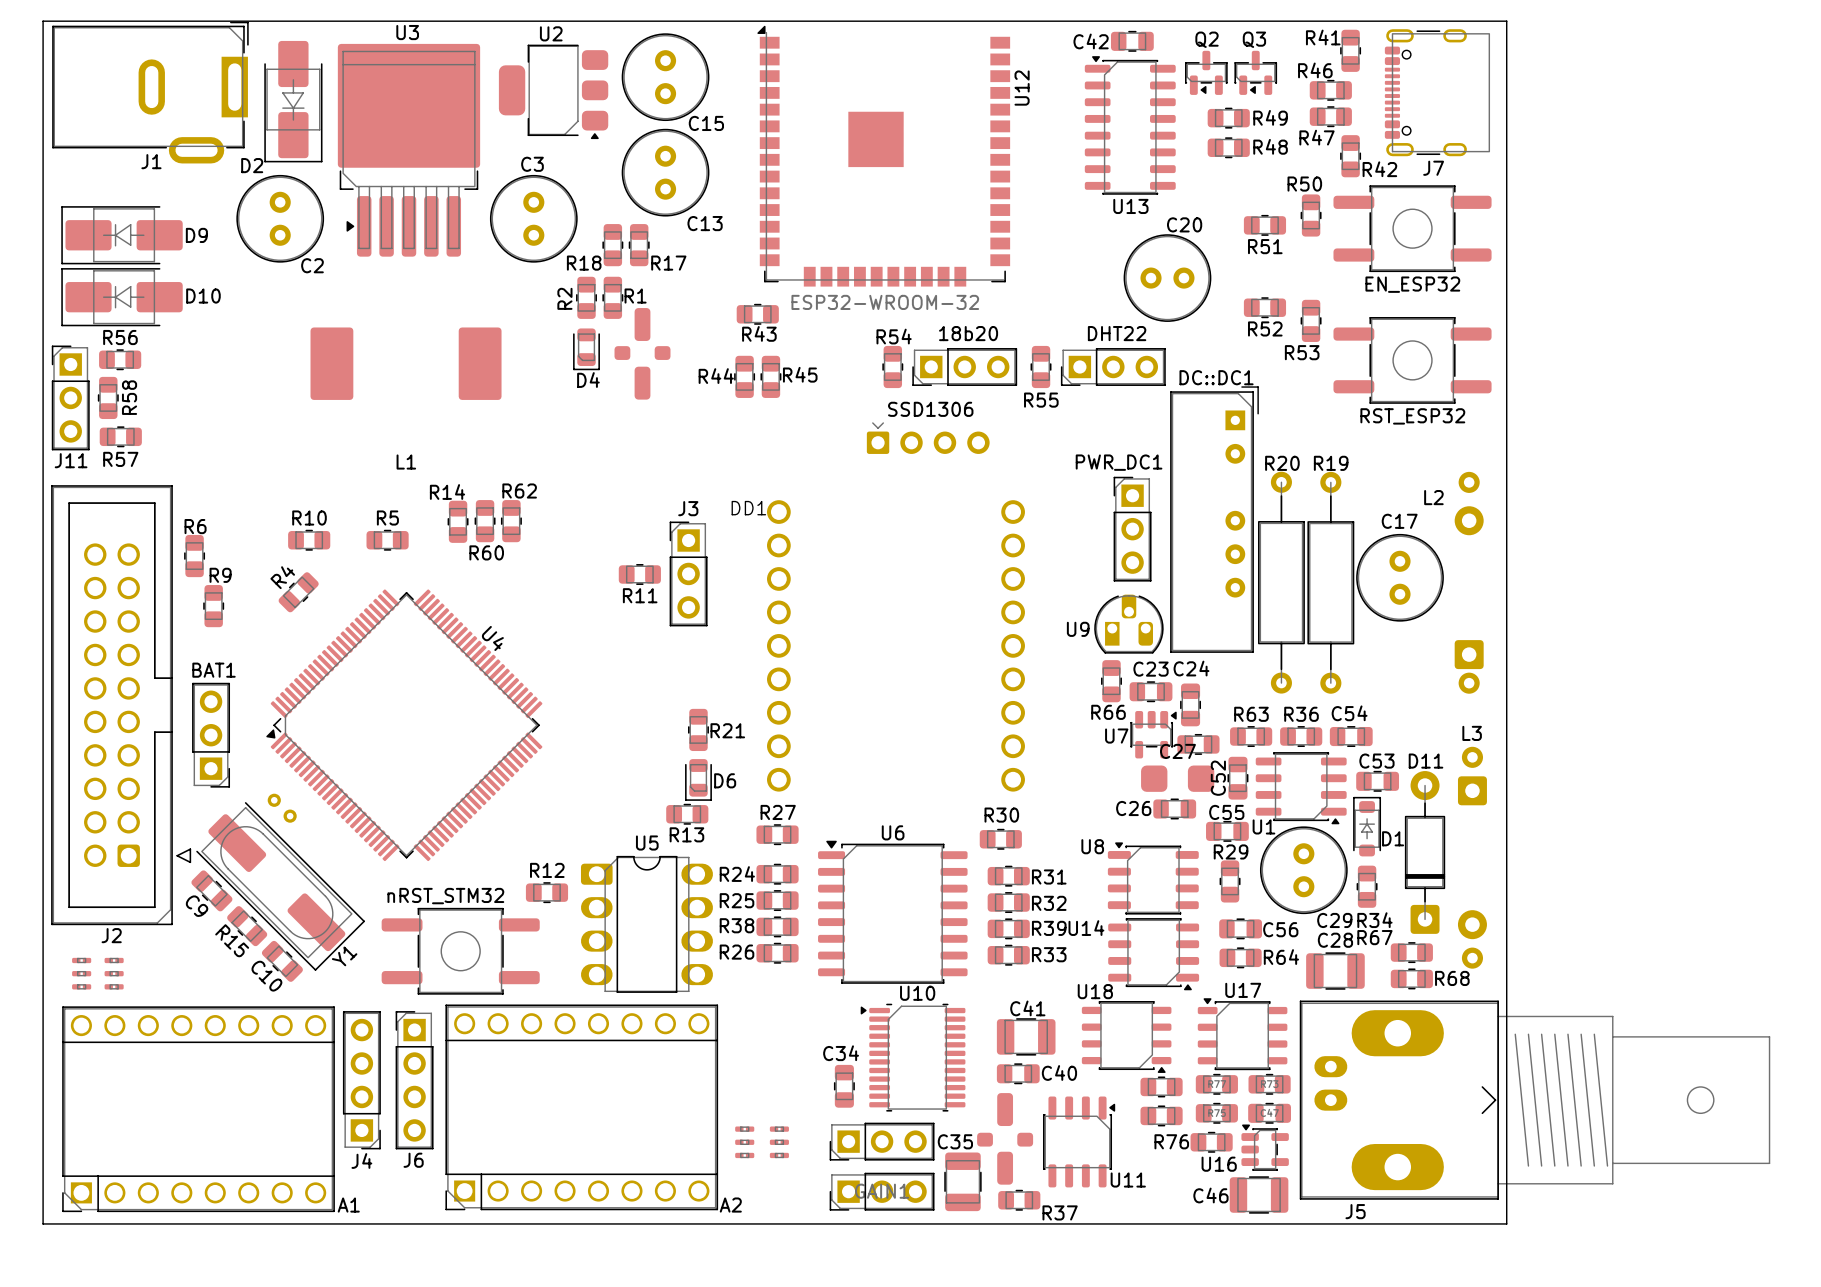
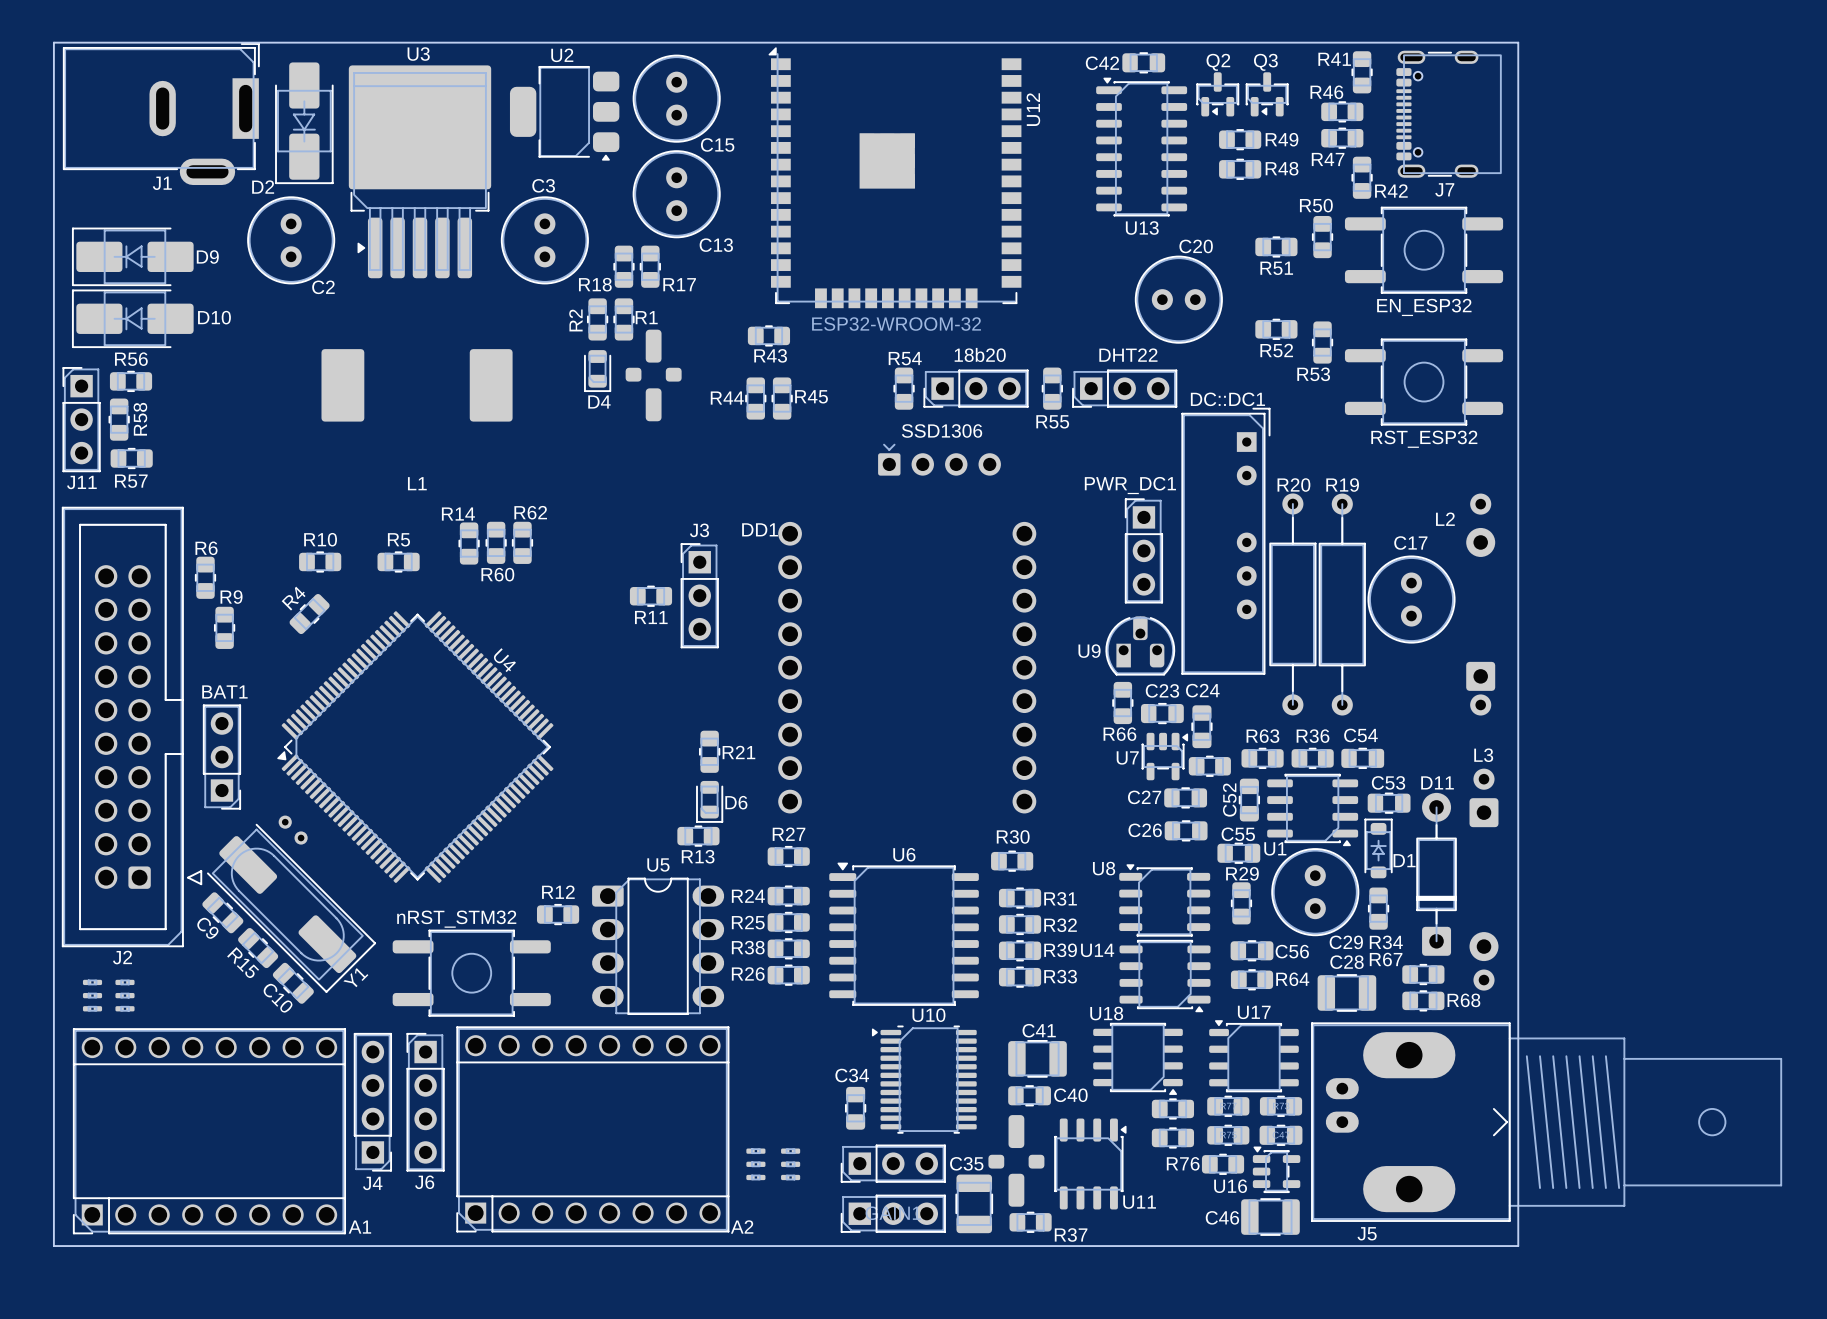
C27 name position: C27 (1177, 751) -> C27 (1144, 797)
C27 footprint: [1141, 765, 1215, 792] -> [1164, 787, 1208, 809]

